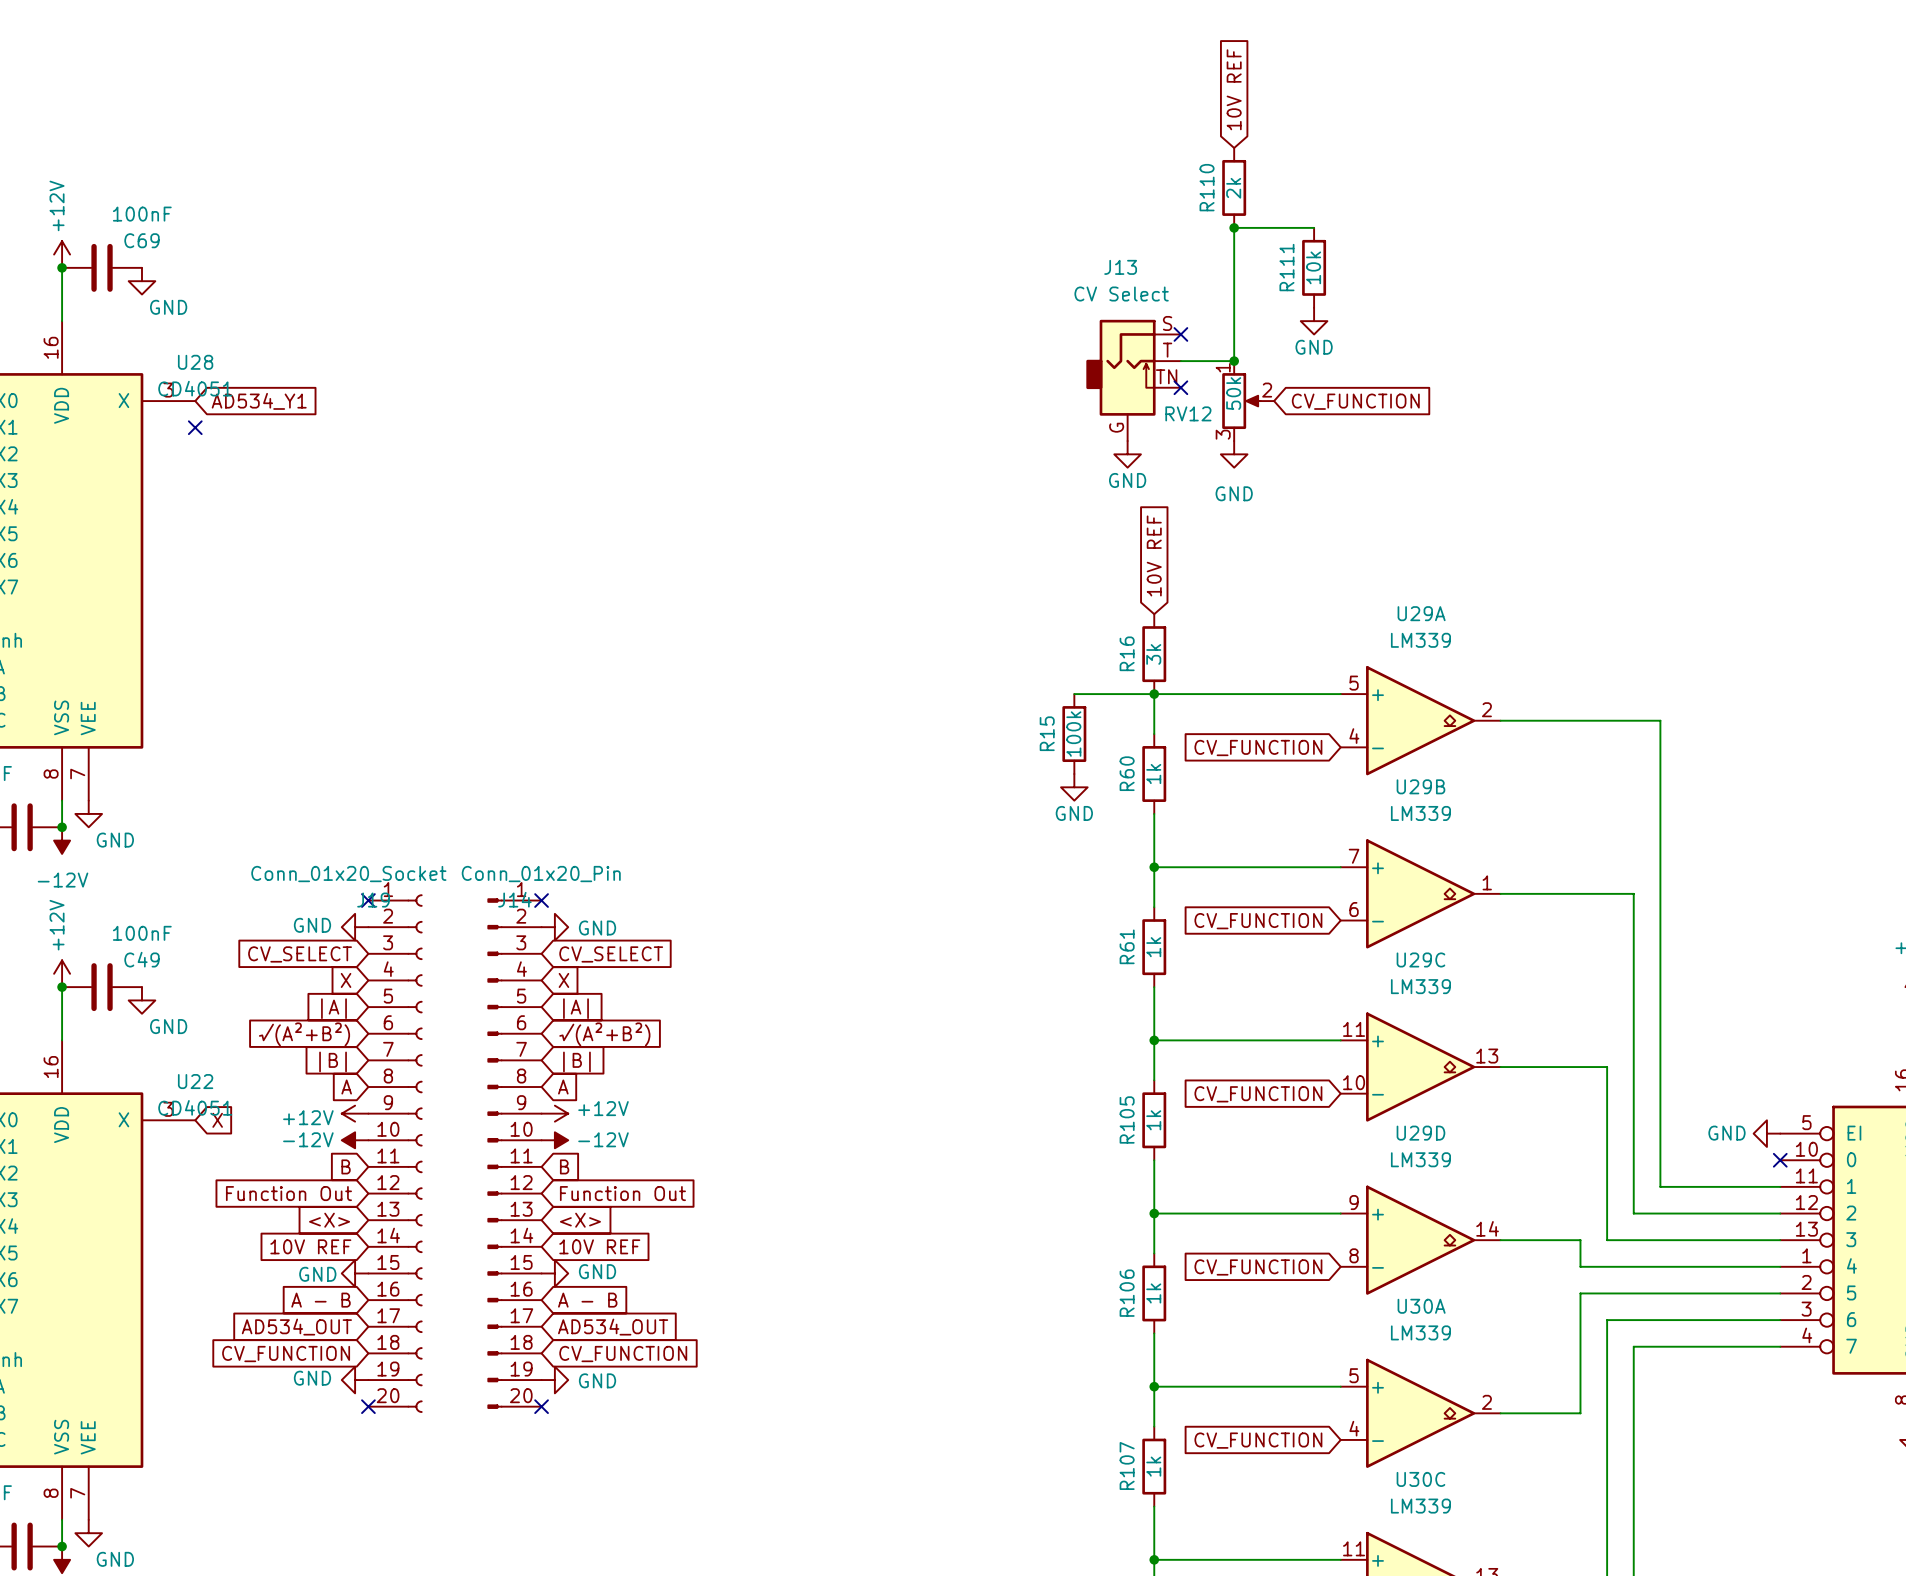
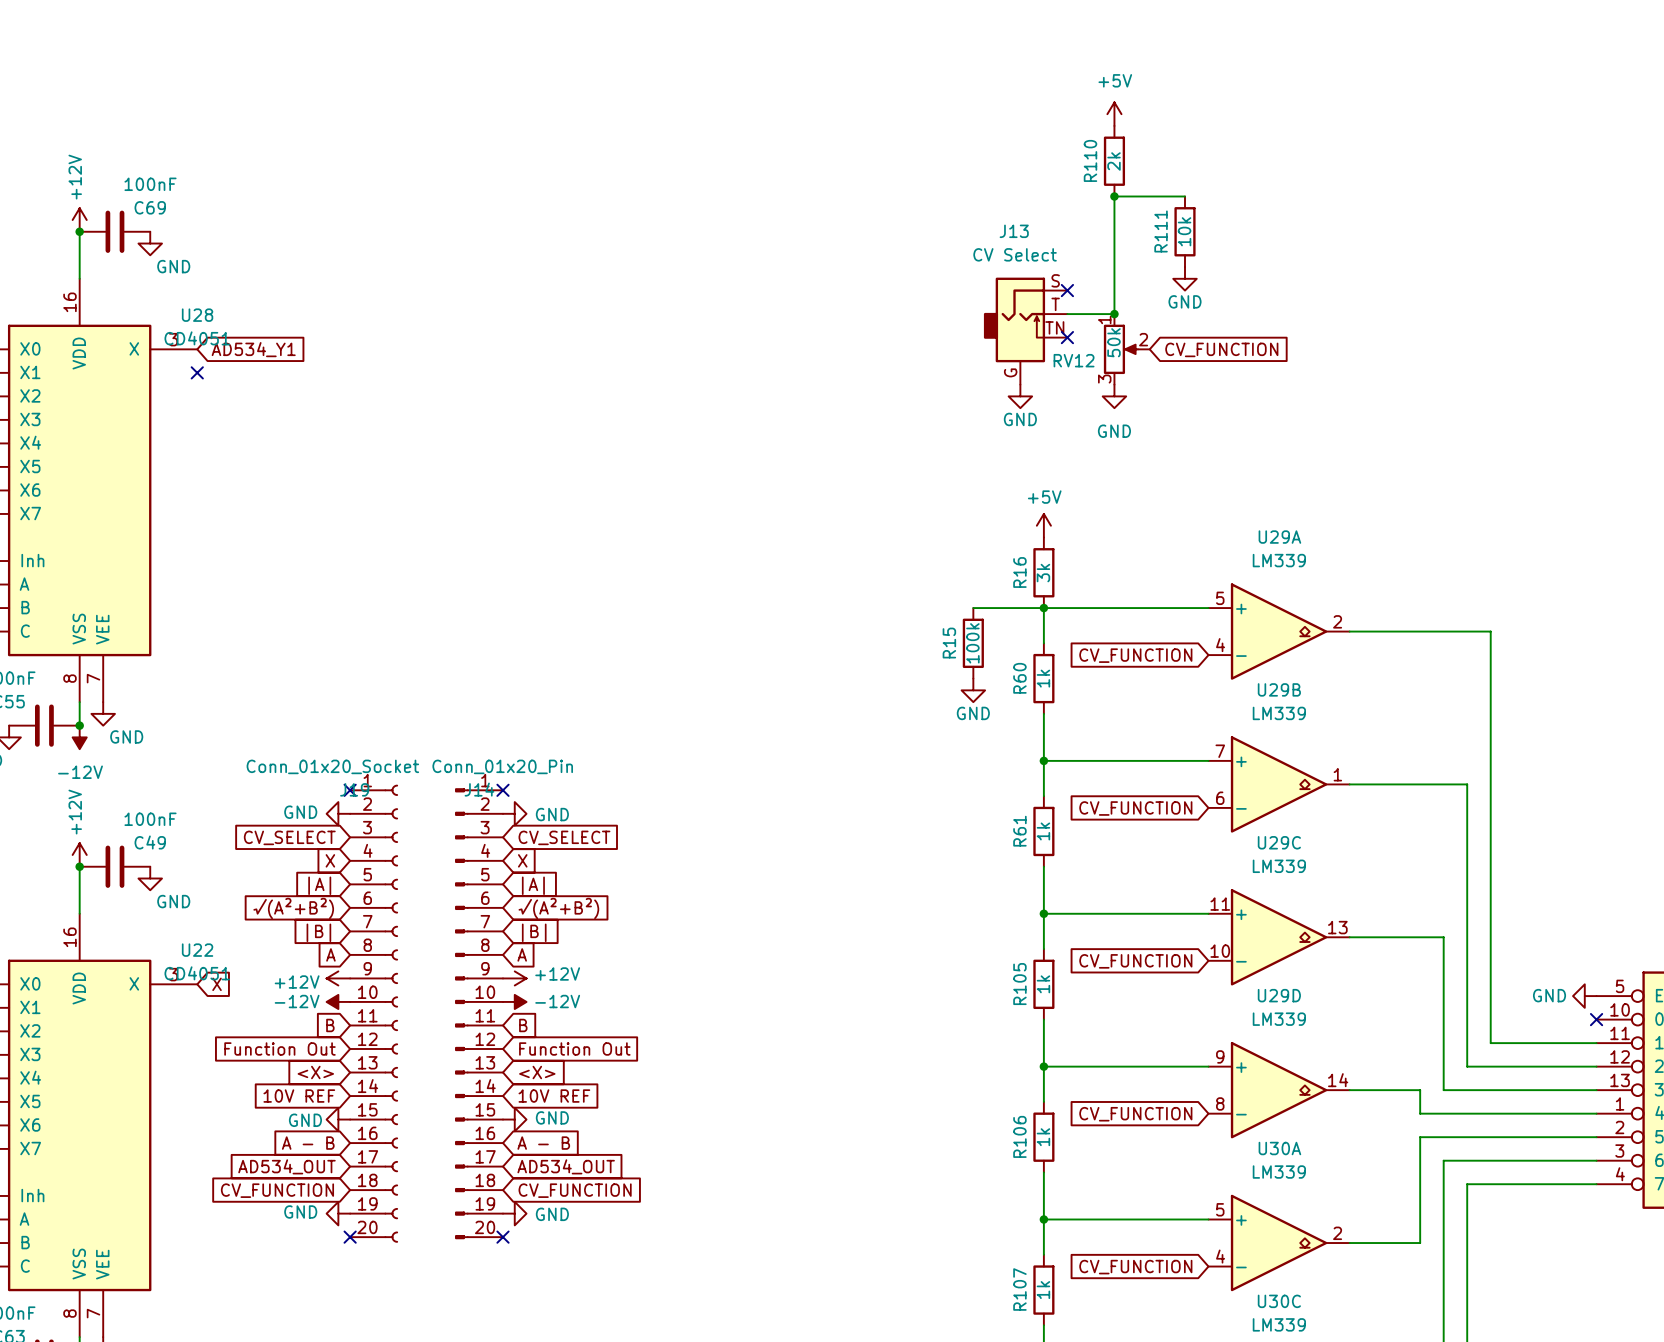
global label: 10V REF (1234, 89) -> none
power symbol: none -> +5V (1114, 114)
global label: 10V REF (1154, 555) -> none
power symbol: none -> +5V (1043, 525)

